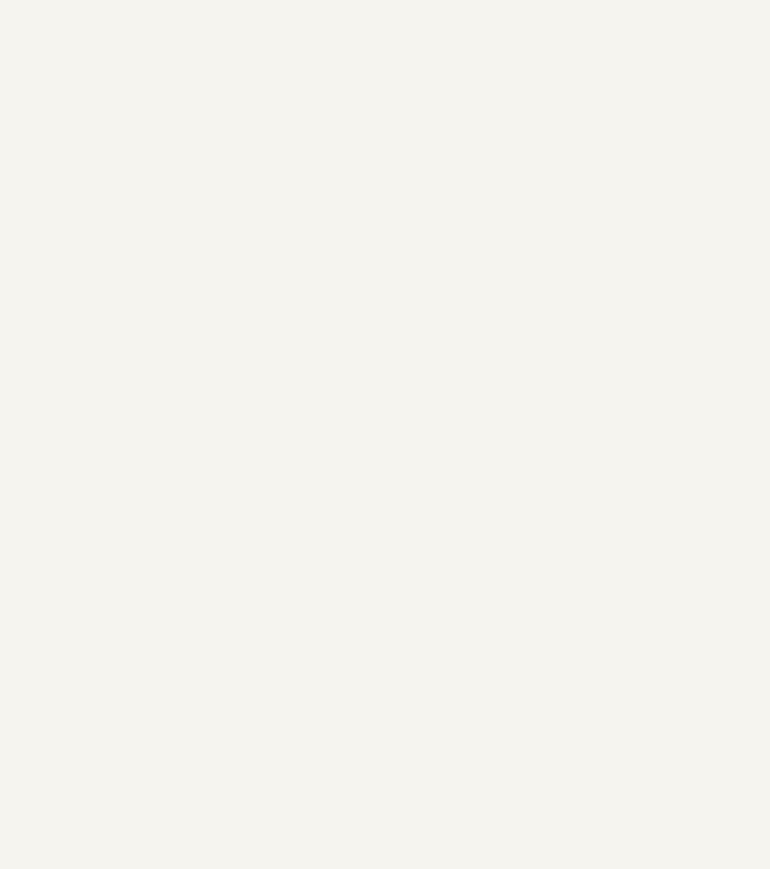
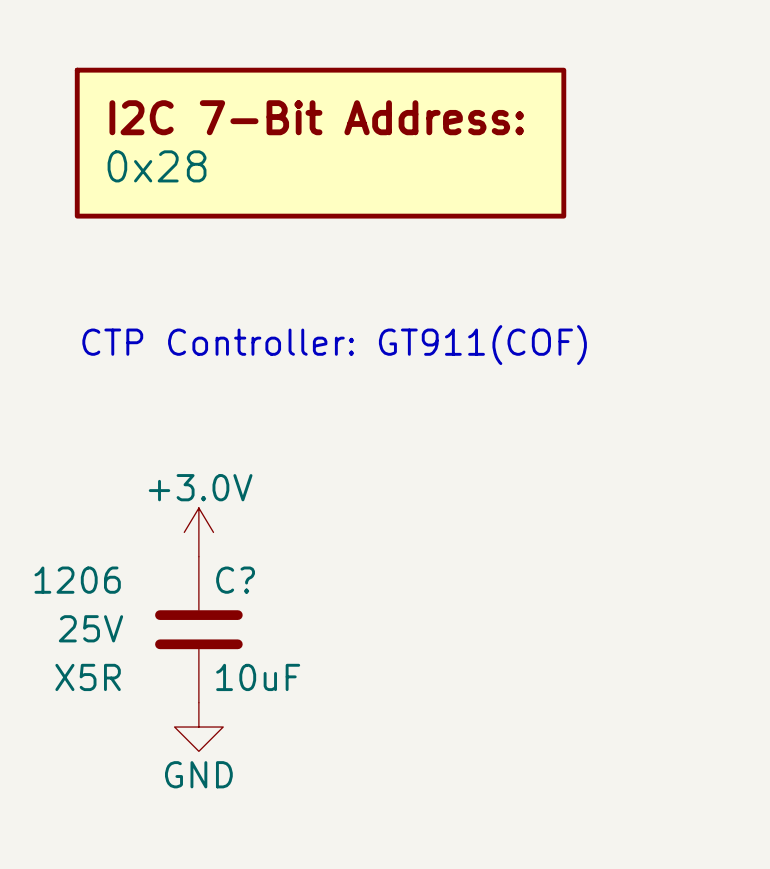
part: none -> 0x28 (320, 143)
text: none -> CTP Controller: GT911(COF) (334, 345)
power symbol: none -> +3.0V (198, 532)
C?: none -> 10uF (198, 629)
power symbol: none -> GND (198, 727)

